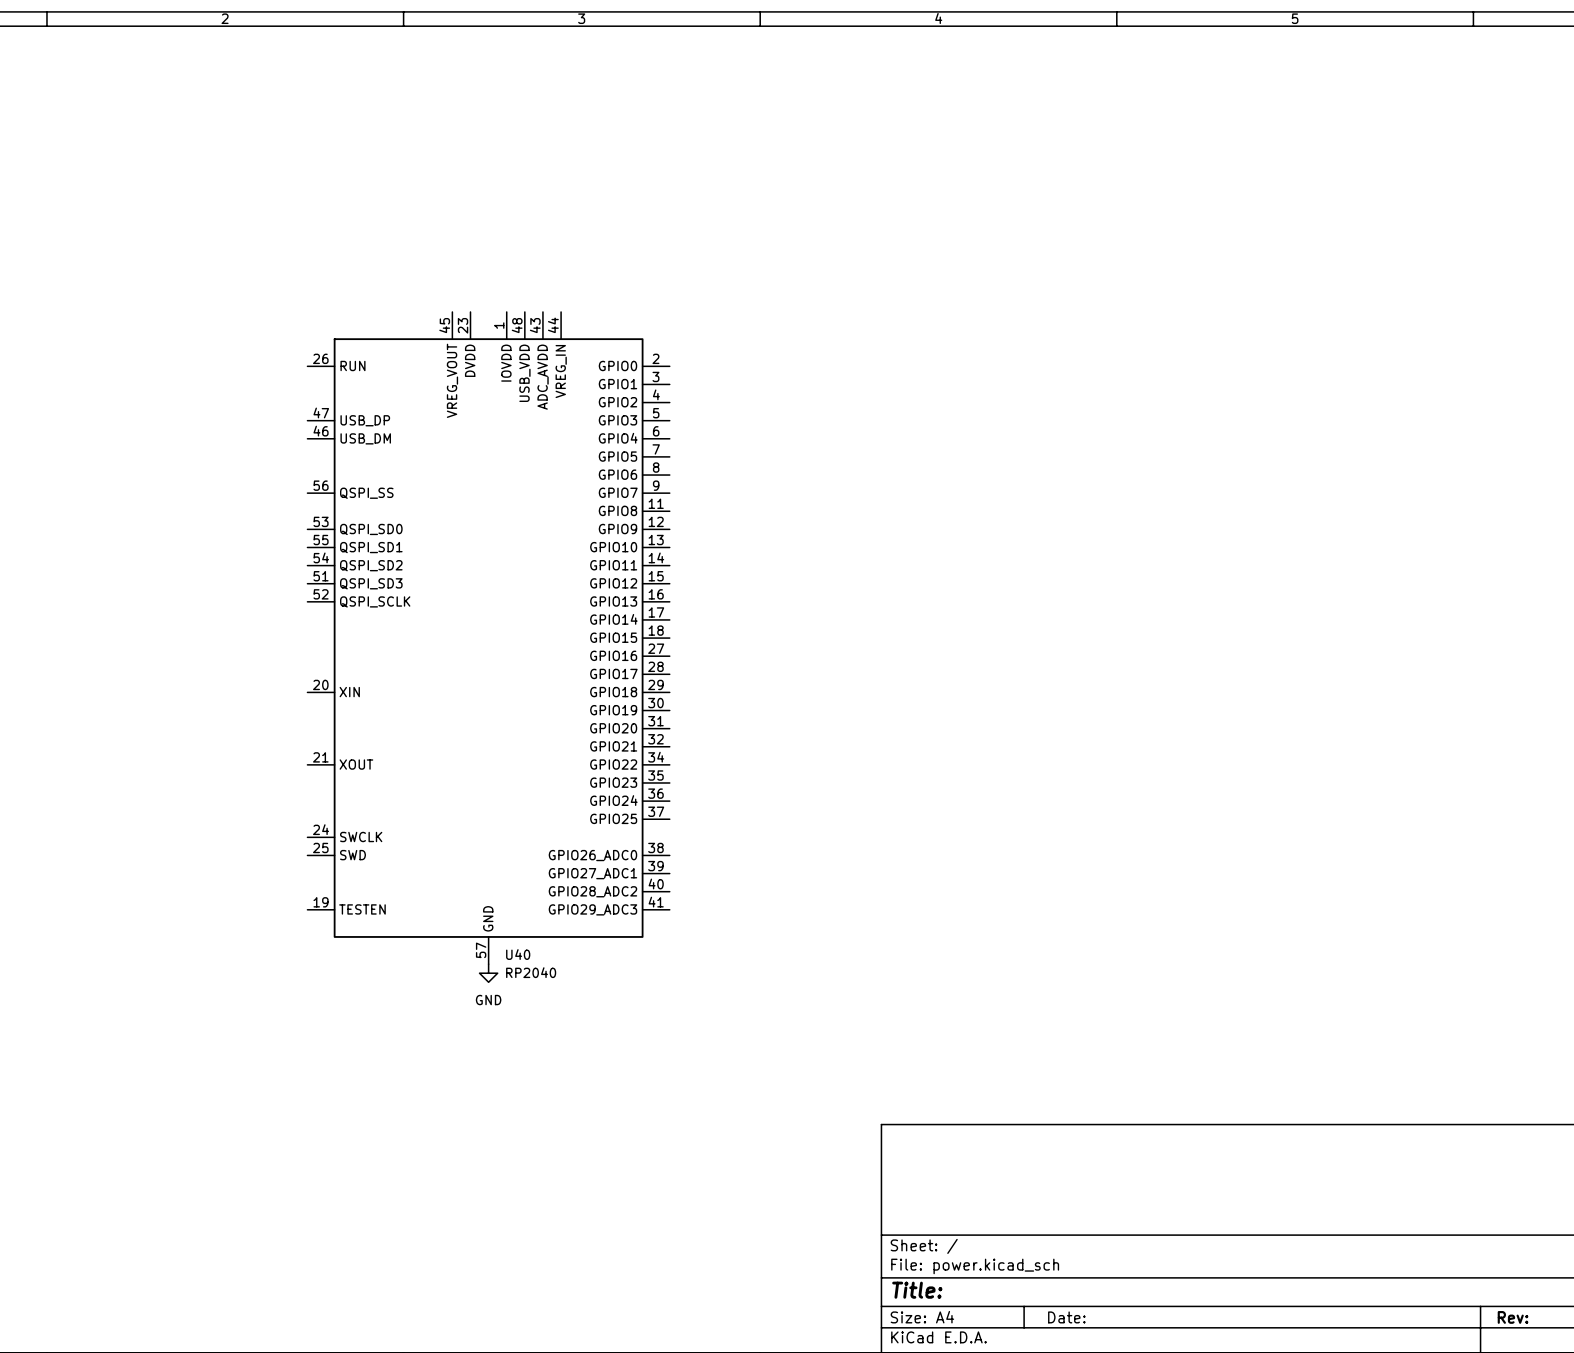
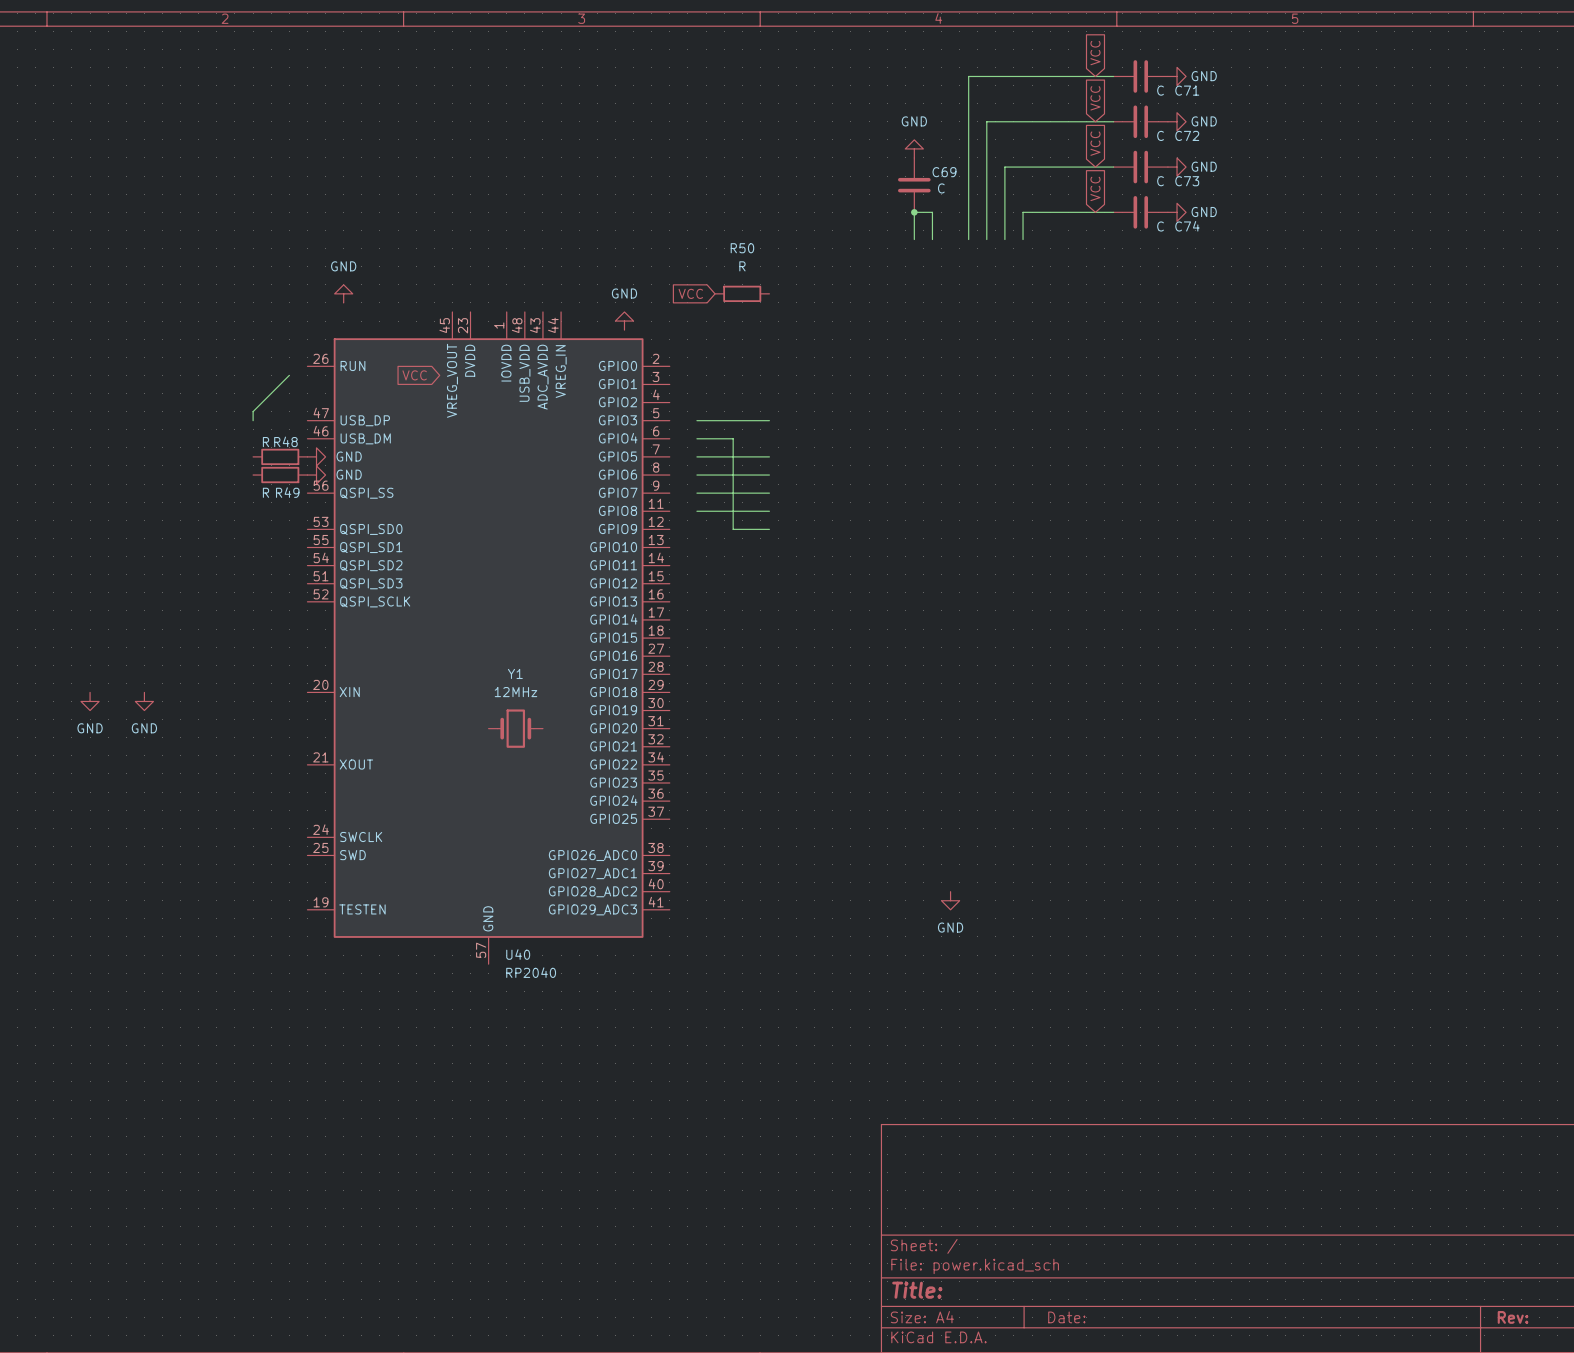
global label: none -> VCC (1095, 53)
wire: none -> (1113, 76) (968, 76) (968, 239)
C71: none -> C (1140, 76)
power symbol: none -> GND (1177, 76)
global label: none -> VCC (1095, 98)
wire: none -> (1113, 121) (986, 121) (986, 239)
C72: none -> C (1140, 121)
power symbol: none -> GND (1177, 121)
global label: none -> VCC (1095, 143)
power symbol: none -> GND (914, 148)
wire: none -> (1113, 167) (1004, 167) (1004, 239)
C73: none -> C (1140, 167)
power symbol: none -> GND (1177, 167)
C69: none -> C (914, 185)
global label: none -> VCC (1095, 188)
junction: none -> (914, 212)
wire: none -> (1113, 212) (1023, 212) (1023, 239)
C74: none -> C (1140, 212)
power symbol: none -> GND (1177, 212)
wire: none -> (914, 239) (914, 212) (932, 212) (932, 239)
power symbol: none -> GND (343, 293)
global label: none -> VCC (690, 293)
R50: none -> R (742, 293)
power symbol: none -> GND (624, 321)
wire: none -> (289, 375) (253, 411) (253, 420)
global label: none -> VCC (414, 375)
wire: none -> (696, 420) (769, 420)
wire: none -> (696, 438) (733, 438) (733, 529) (769, 529)
R48: none -> R (280, 456)
power symbol: none -> GND (316, 456)
wire: none -> (696, 456) (769, 456)
R49: none -> R (280, 475)
power symbol: none -> GND (316, 475)
wire: none -> (696, 475) (769, 475)
wire: none -> (696, 493) (769, 493)
wire: none -> (696, 511) (769, 511)
power symbol: none -> GND (90, 701)
power symbol: none -> GND (144, 701)
Y1: none -> 12MHz (515, 728)
power symbol: none -> GND (950, 900)
power symbol: GND (488, 973) -> none

